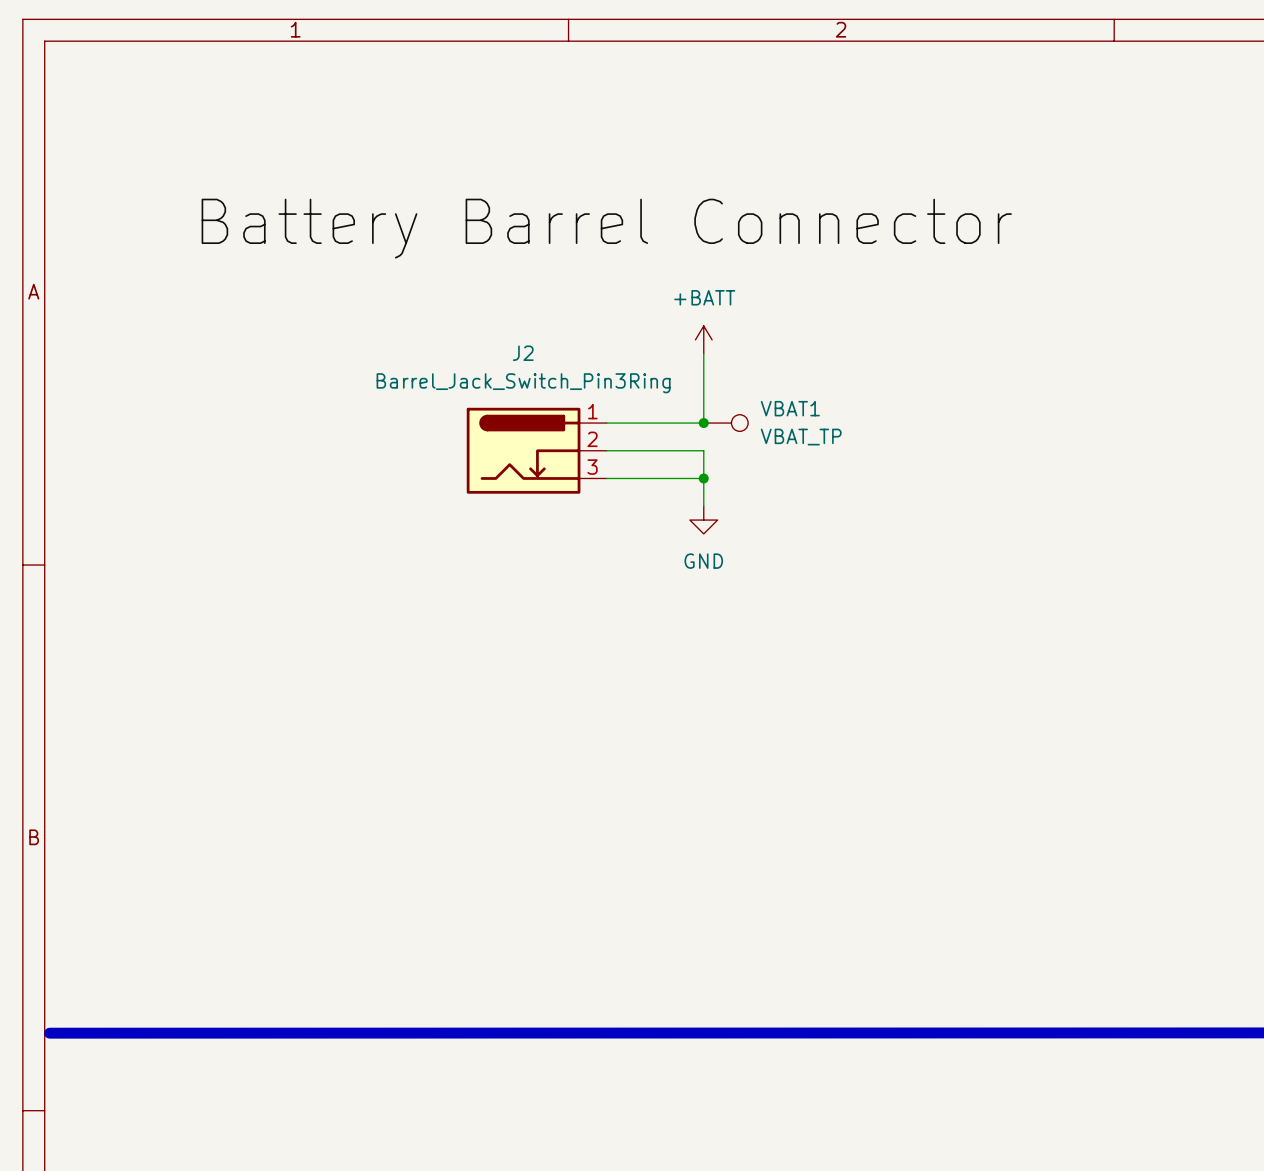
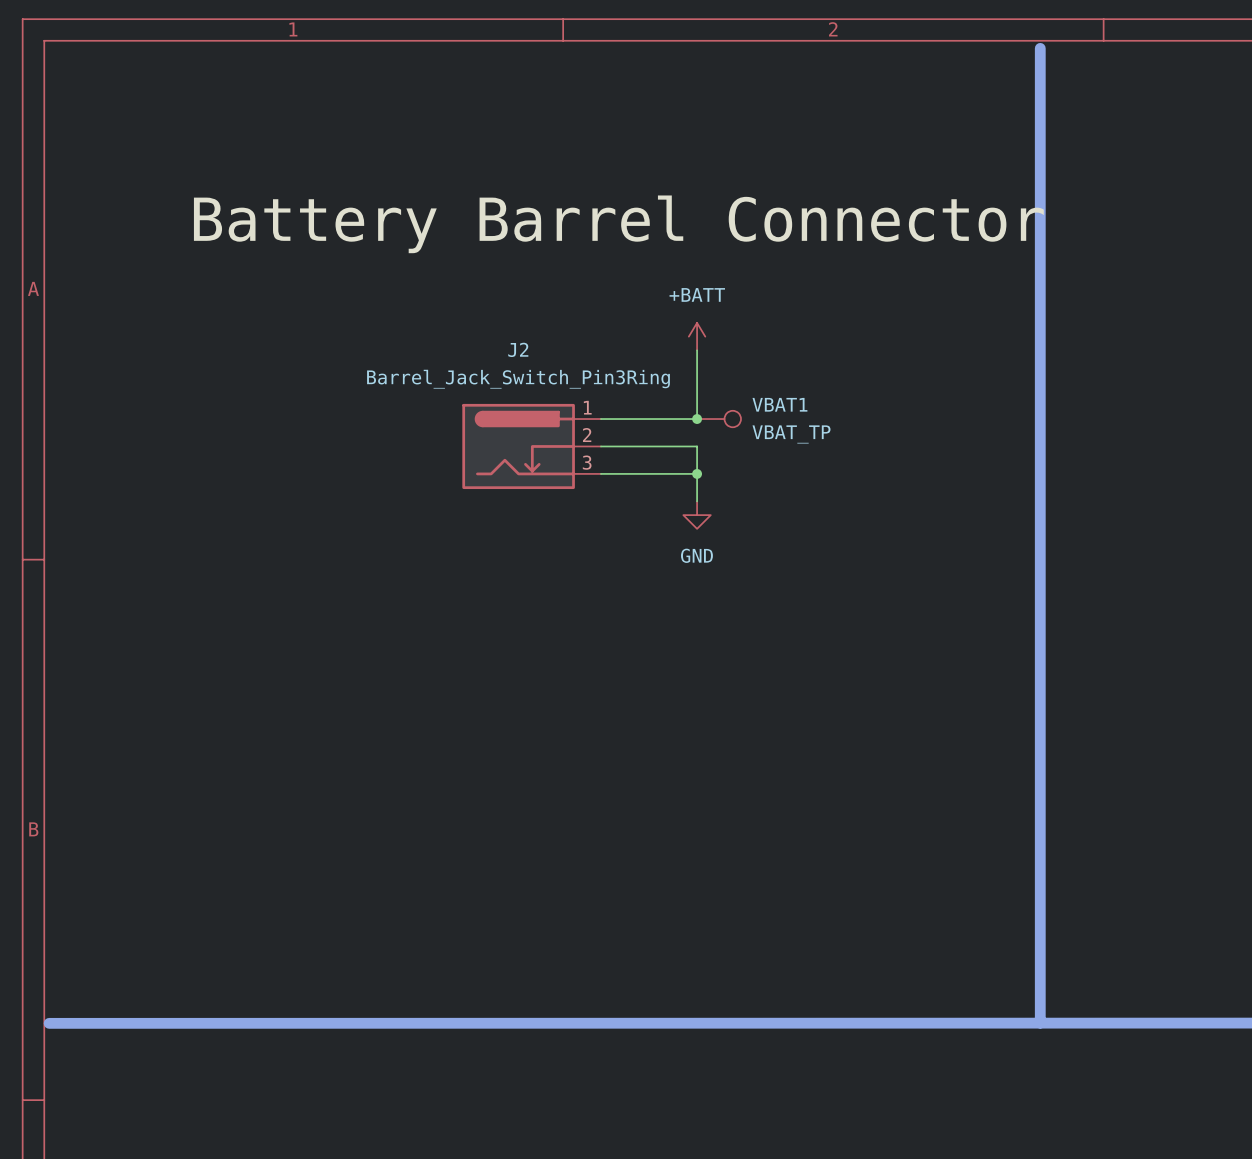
line: none -> (1040, 48) (1040, 1023)

